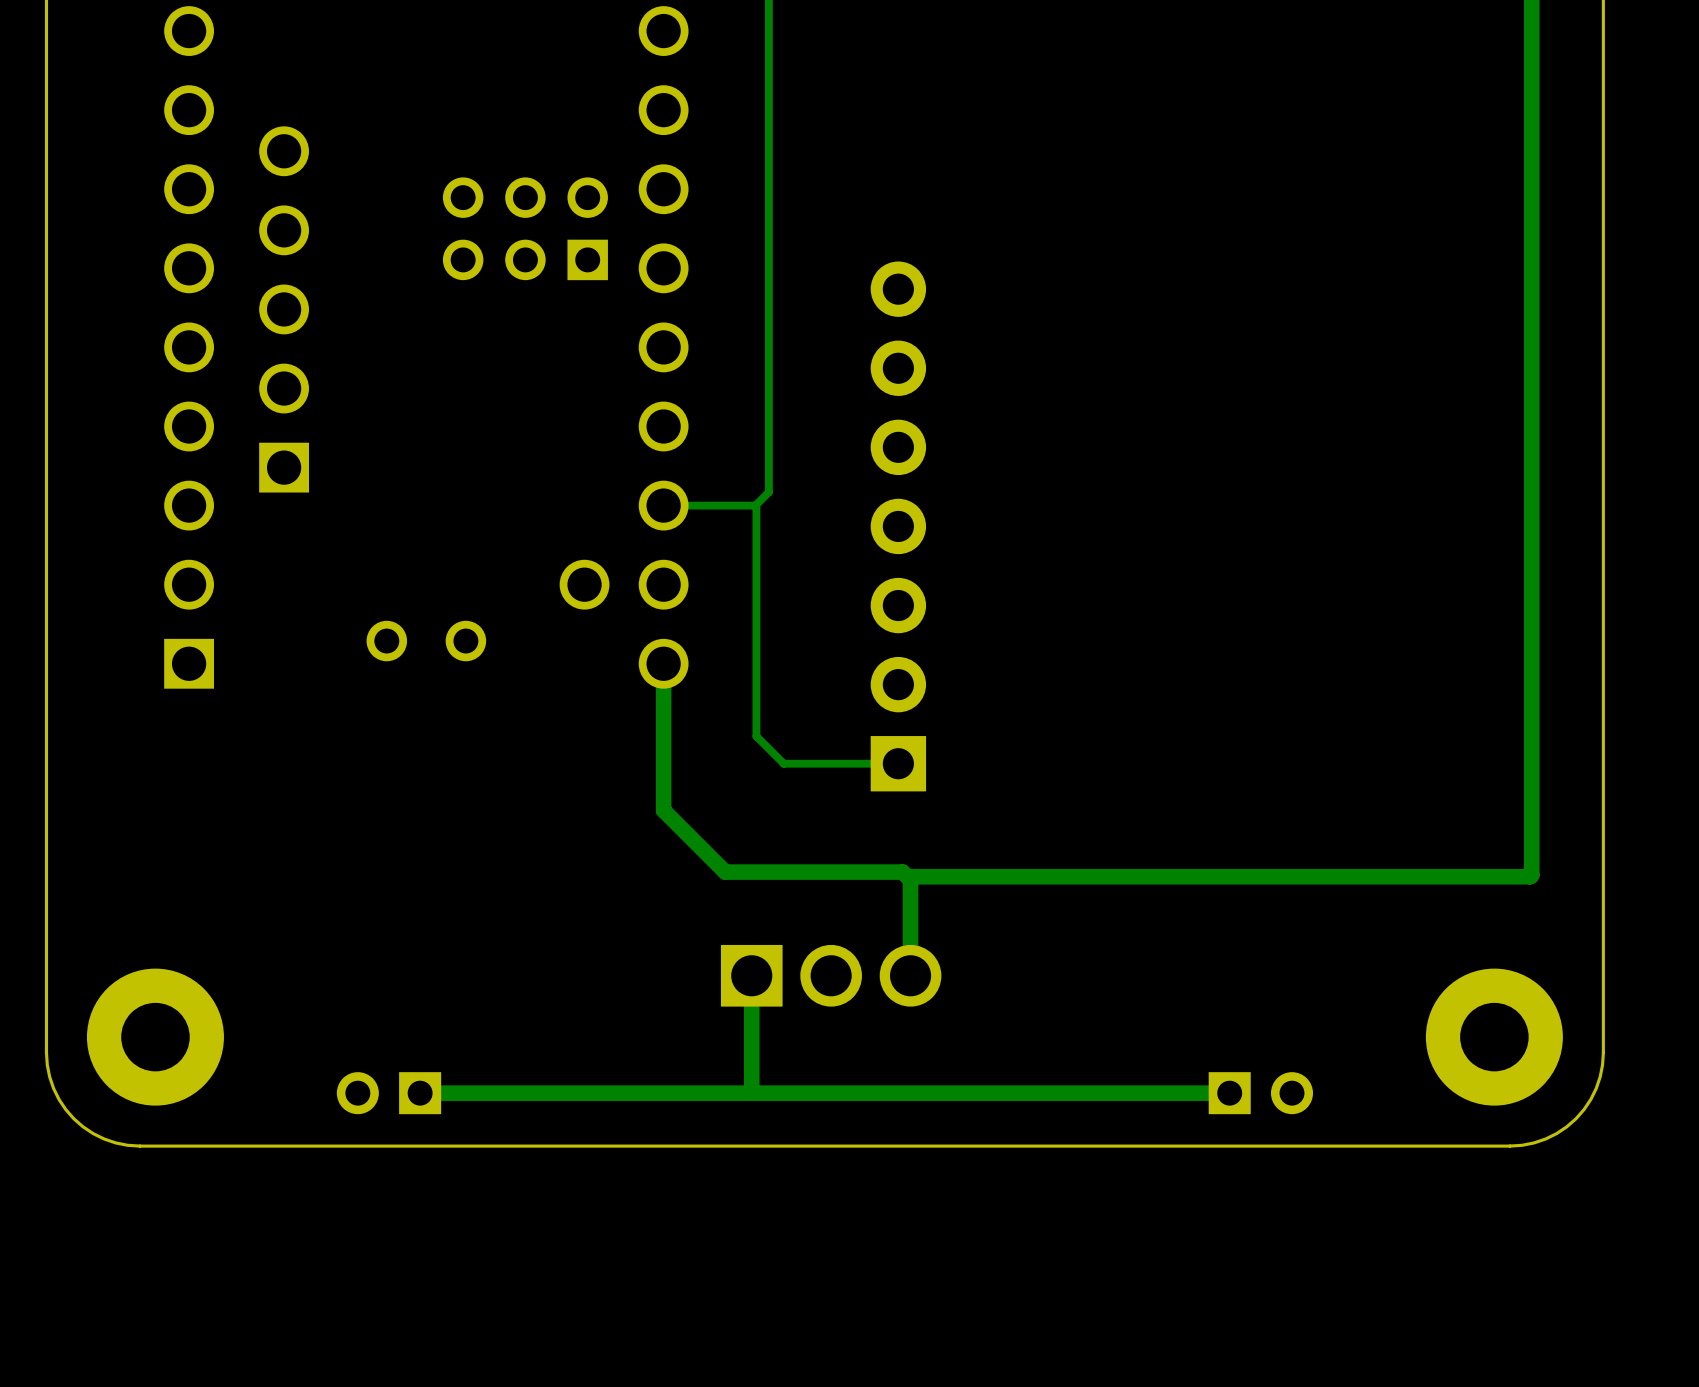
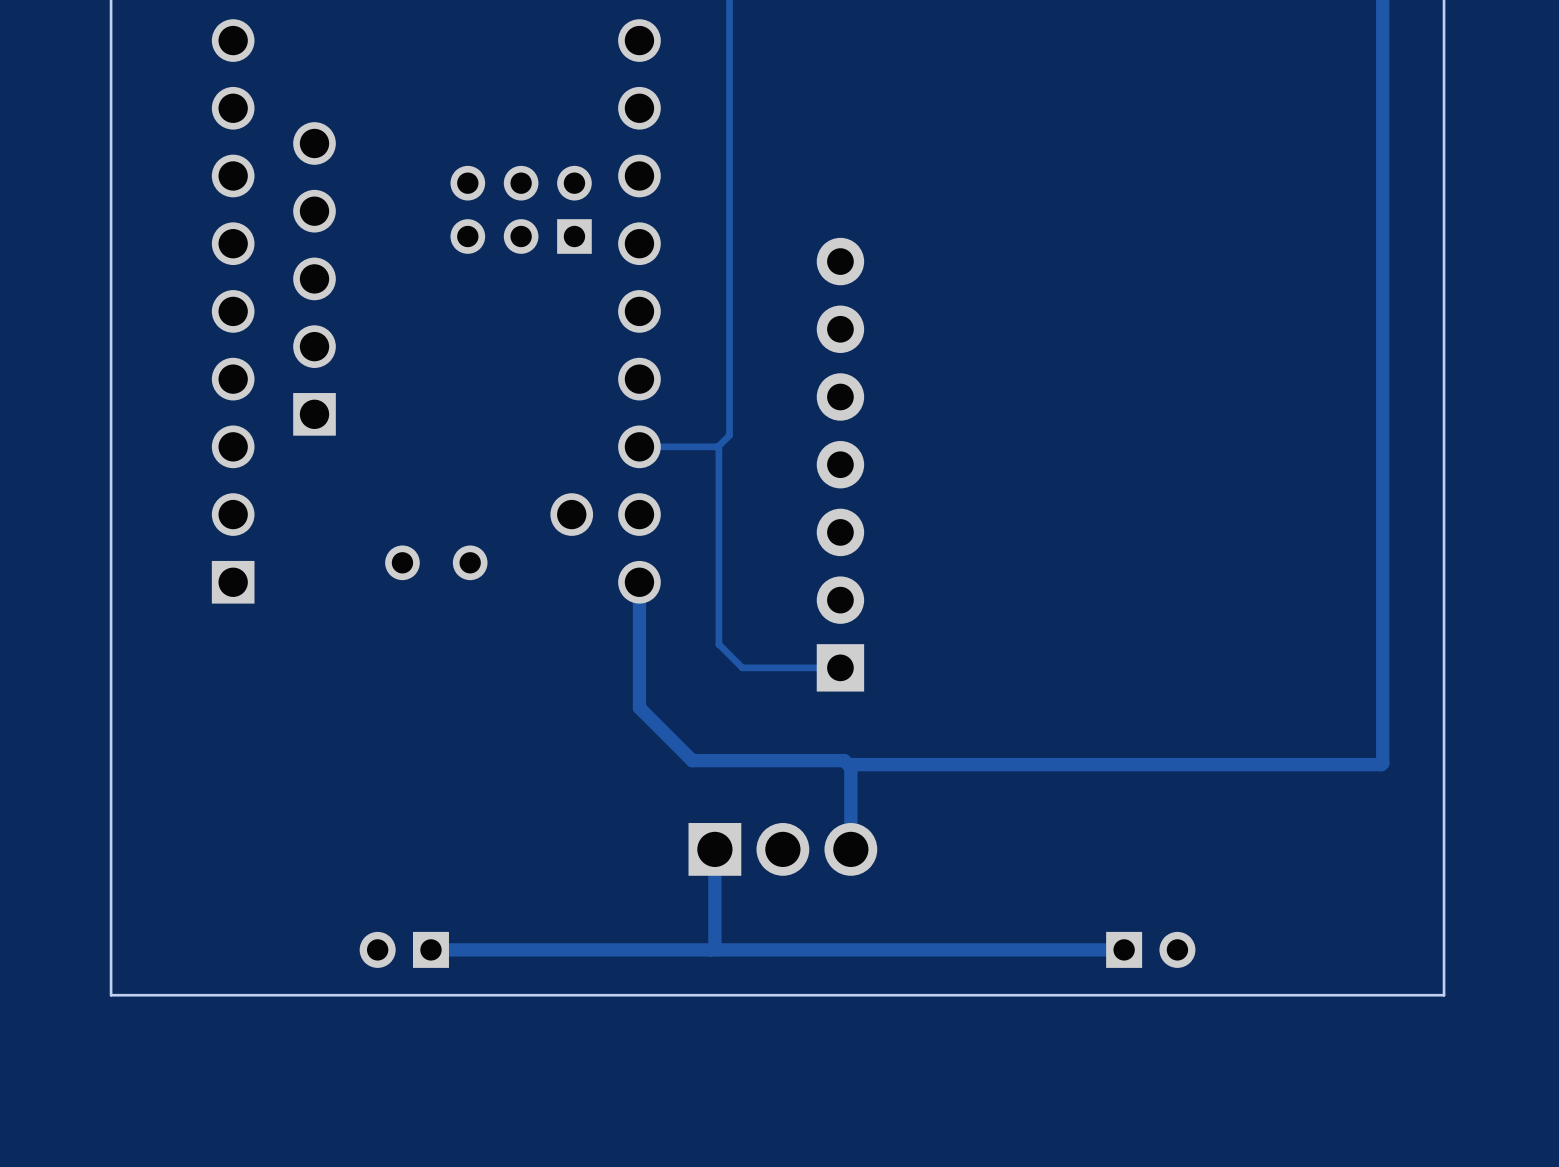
part: (155, 1037) -> none
part: (1494, 1037) -> none
board edge: (46, 1052) (47, 1064) (53, 1088) (65, 1109) (73, 1118) (93, 1133) (104, 1138) (115, 1142) (139, 1146) -> (111, 915) (111, 995) (191, 995)
board edge: (1603, 1052) (1602, 1064) (1596, 1088) (1590, 1099) (1576, 1118) (1556, 1133) (1545, 1138) (1534, 1142) (1509, 1146) -> (1444, 915) (1444, 995) (1364, 995)

